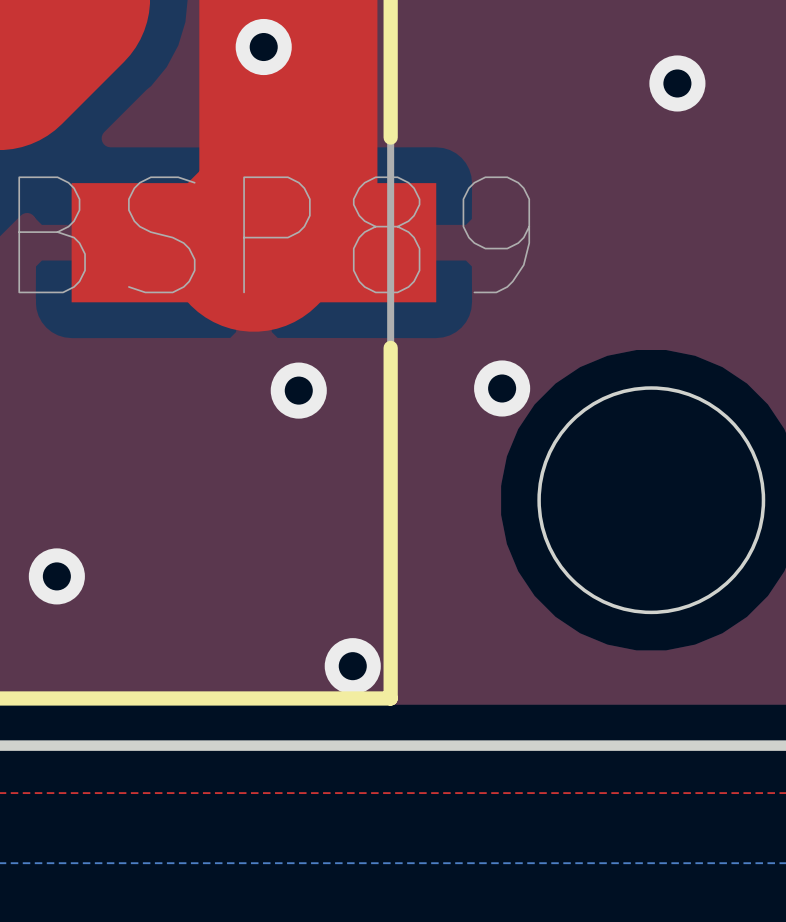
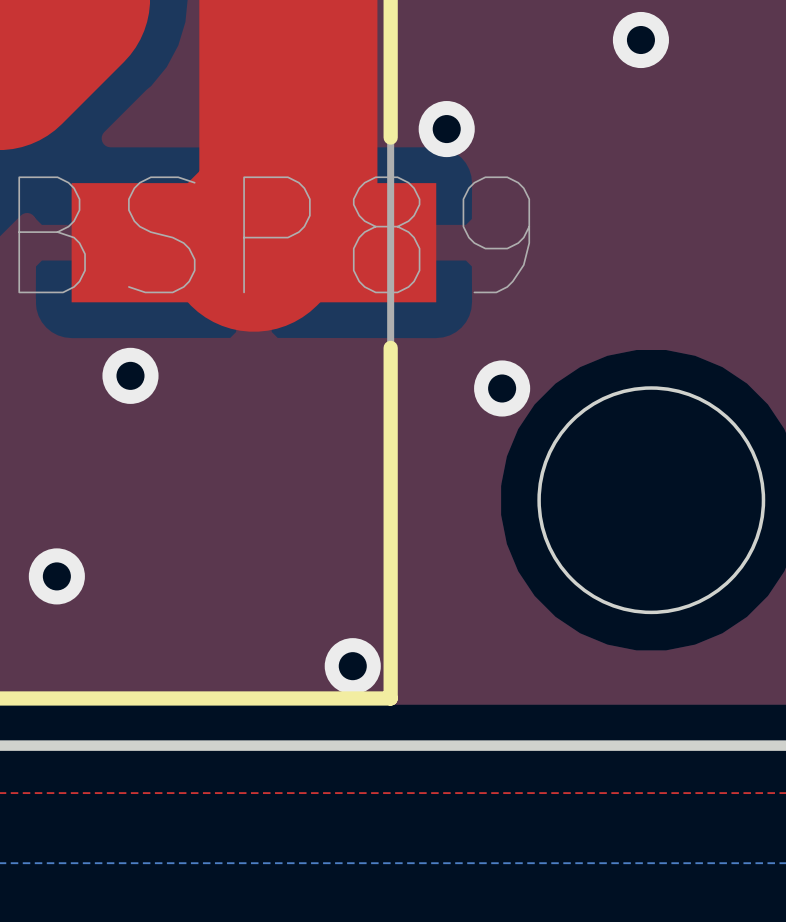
via: (263, 47) -> none
via position: (677, 83) -> (640, 40)
via: none -> (446, 129)
via: none -> (130, 375)
via: (298, 390) -> none

